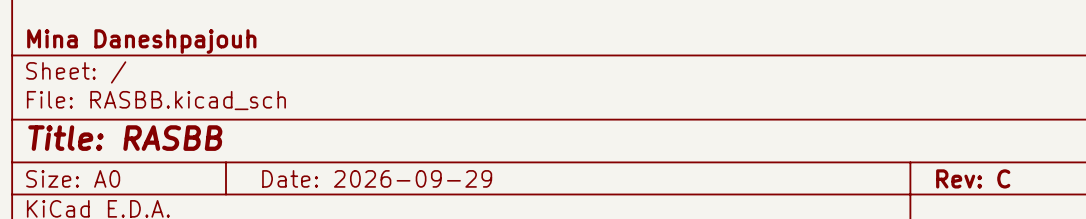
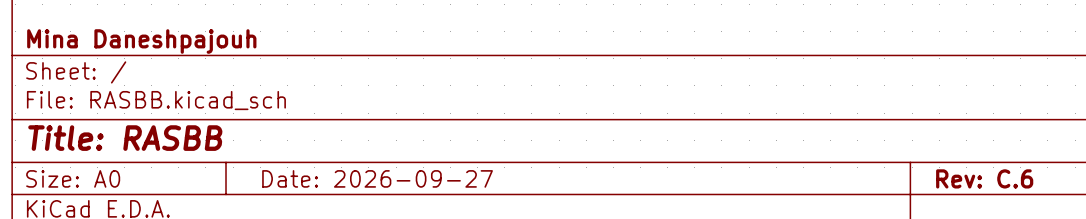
title block: Date: 2026-09-29 (377, 178) -> Date: 2026-09-27 (377, 178)
title block: Rev: C (973, 178) -> Rev: C.6 (984, 178)

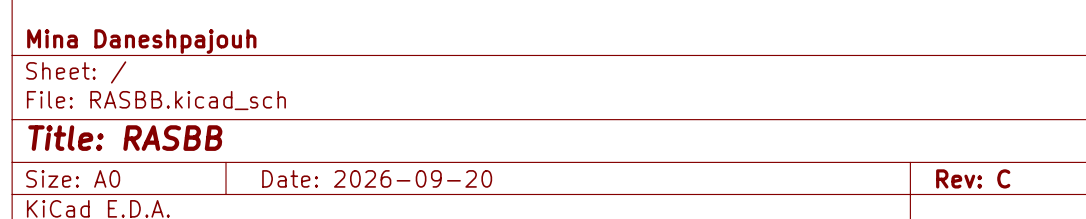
title block: Date: 2026-09-27 (377, 178) -> Date: 2026-09-20 (377, 178)
title block: Rev: C.6 (984, 178) -> Rev: C (973, 178)

